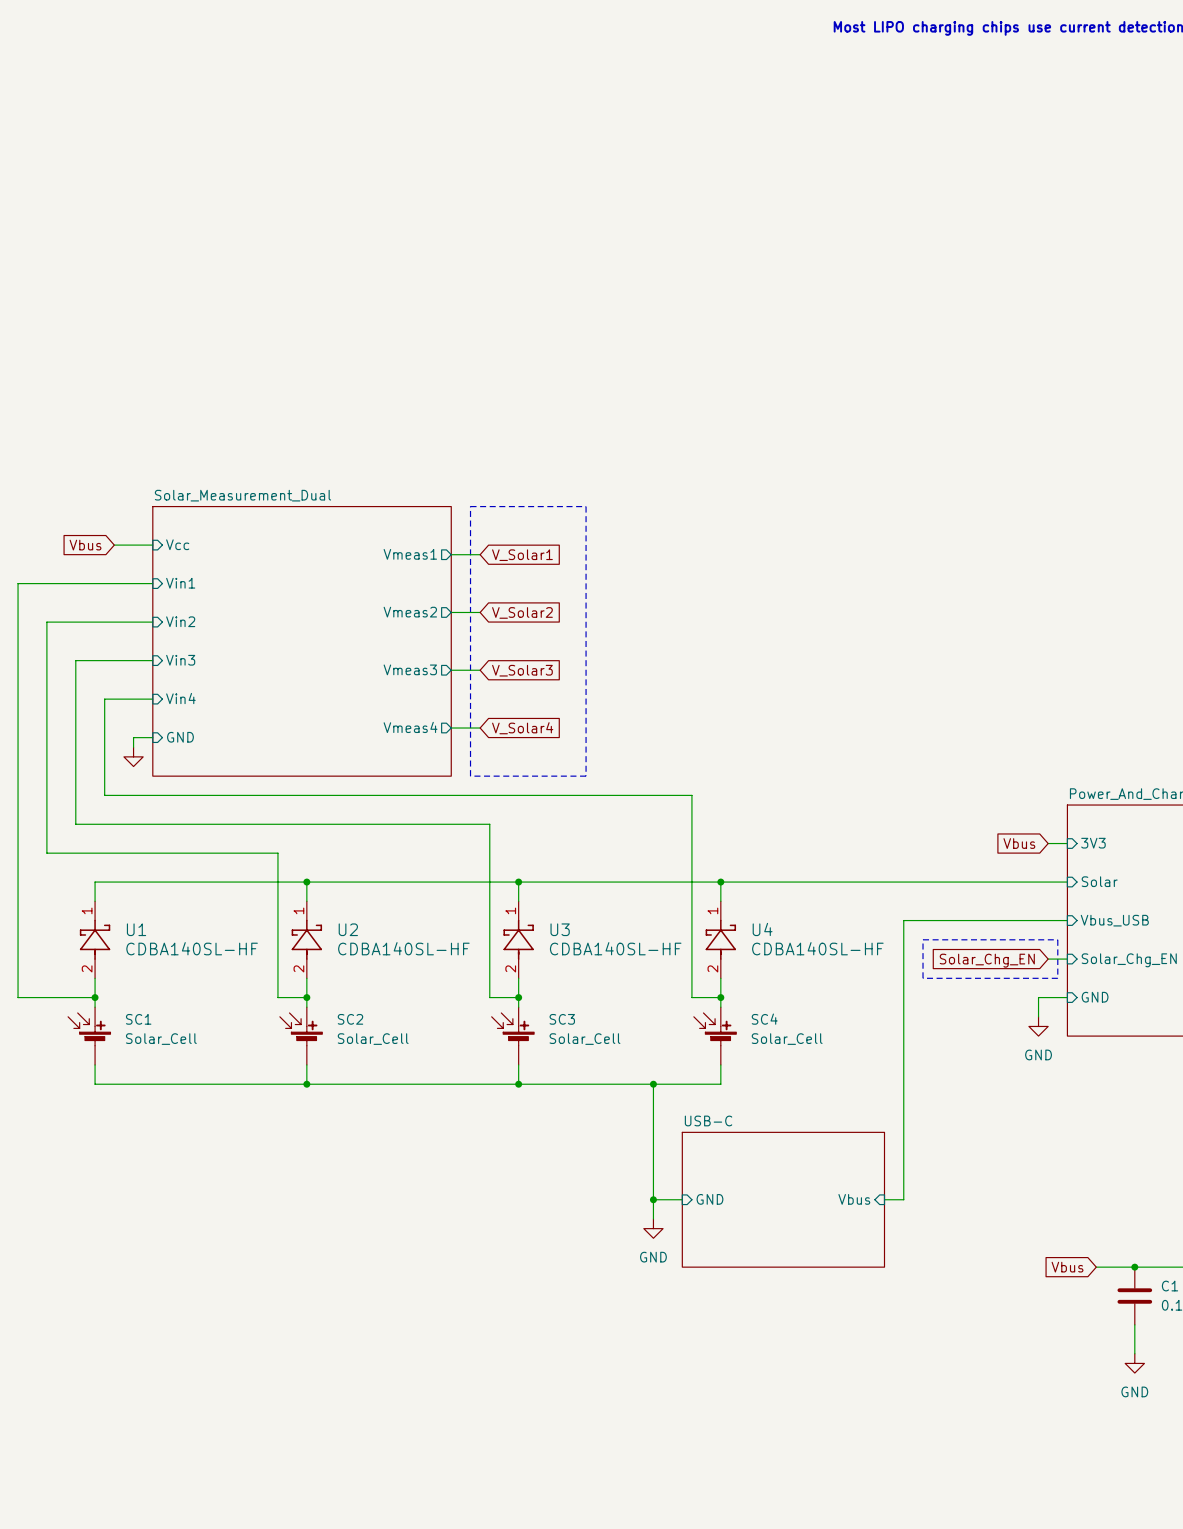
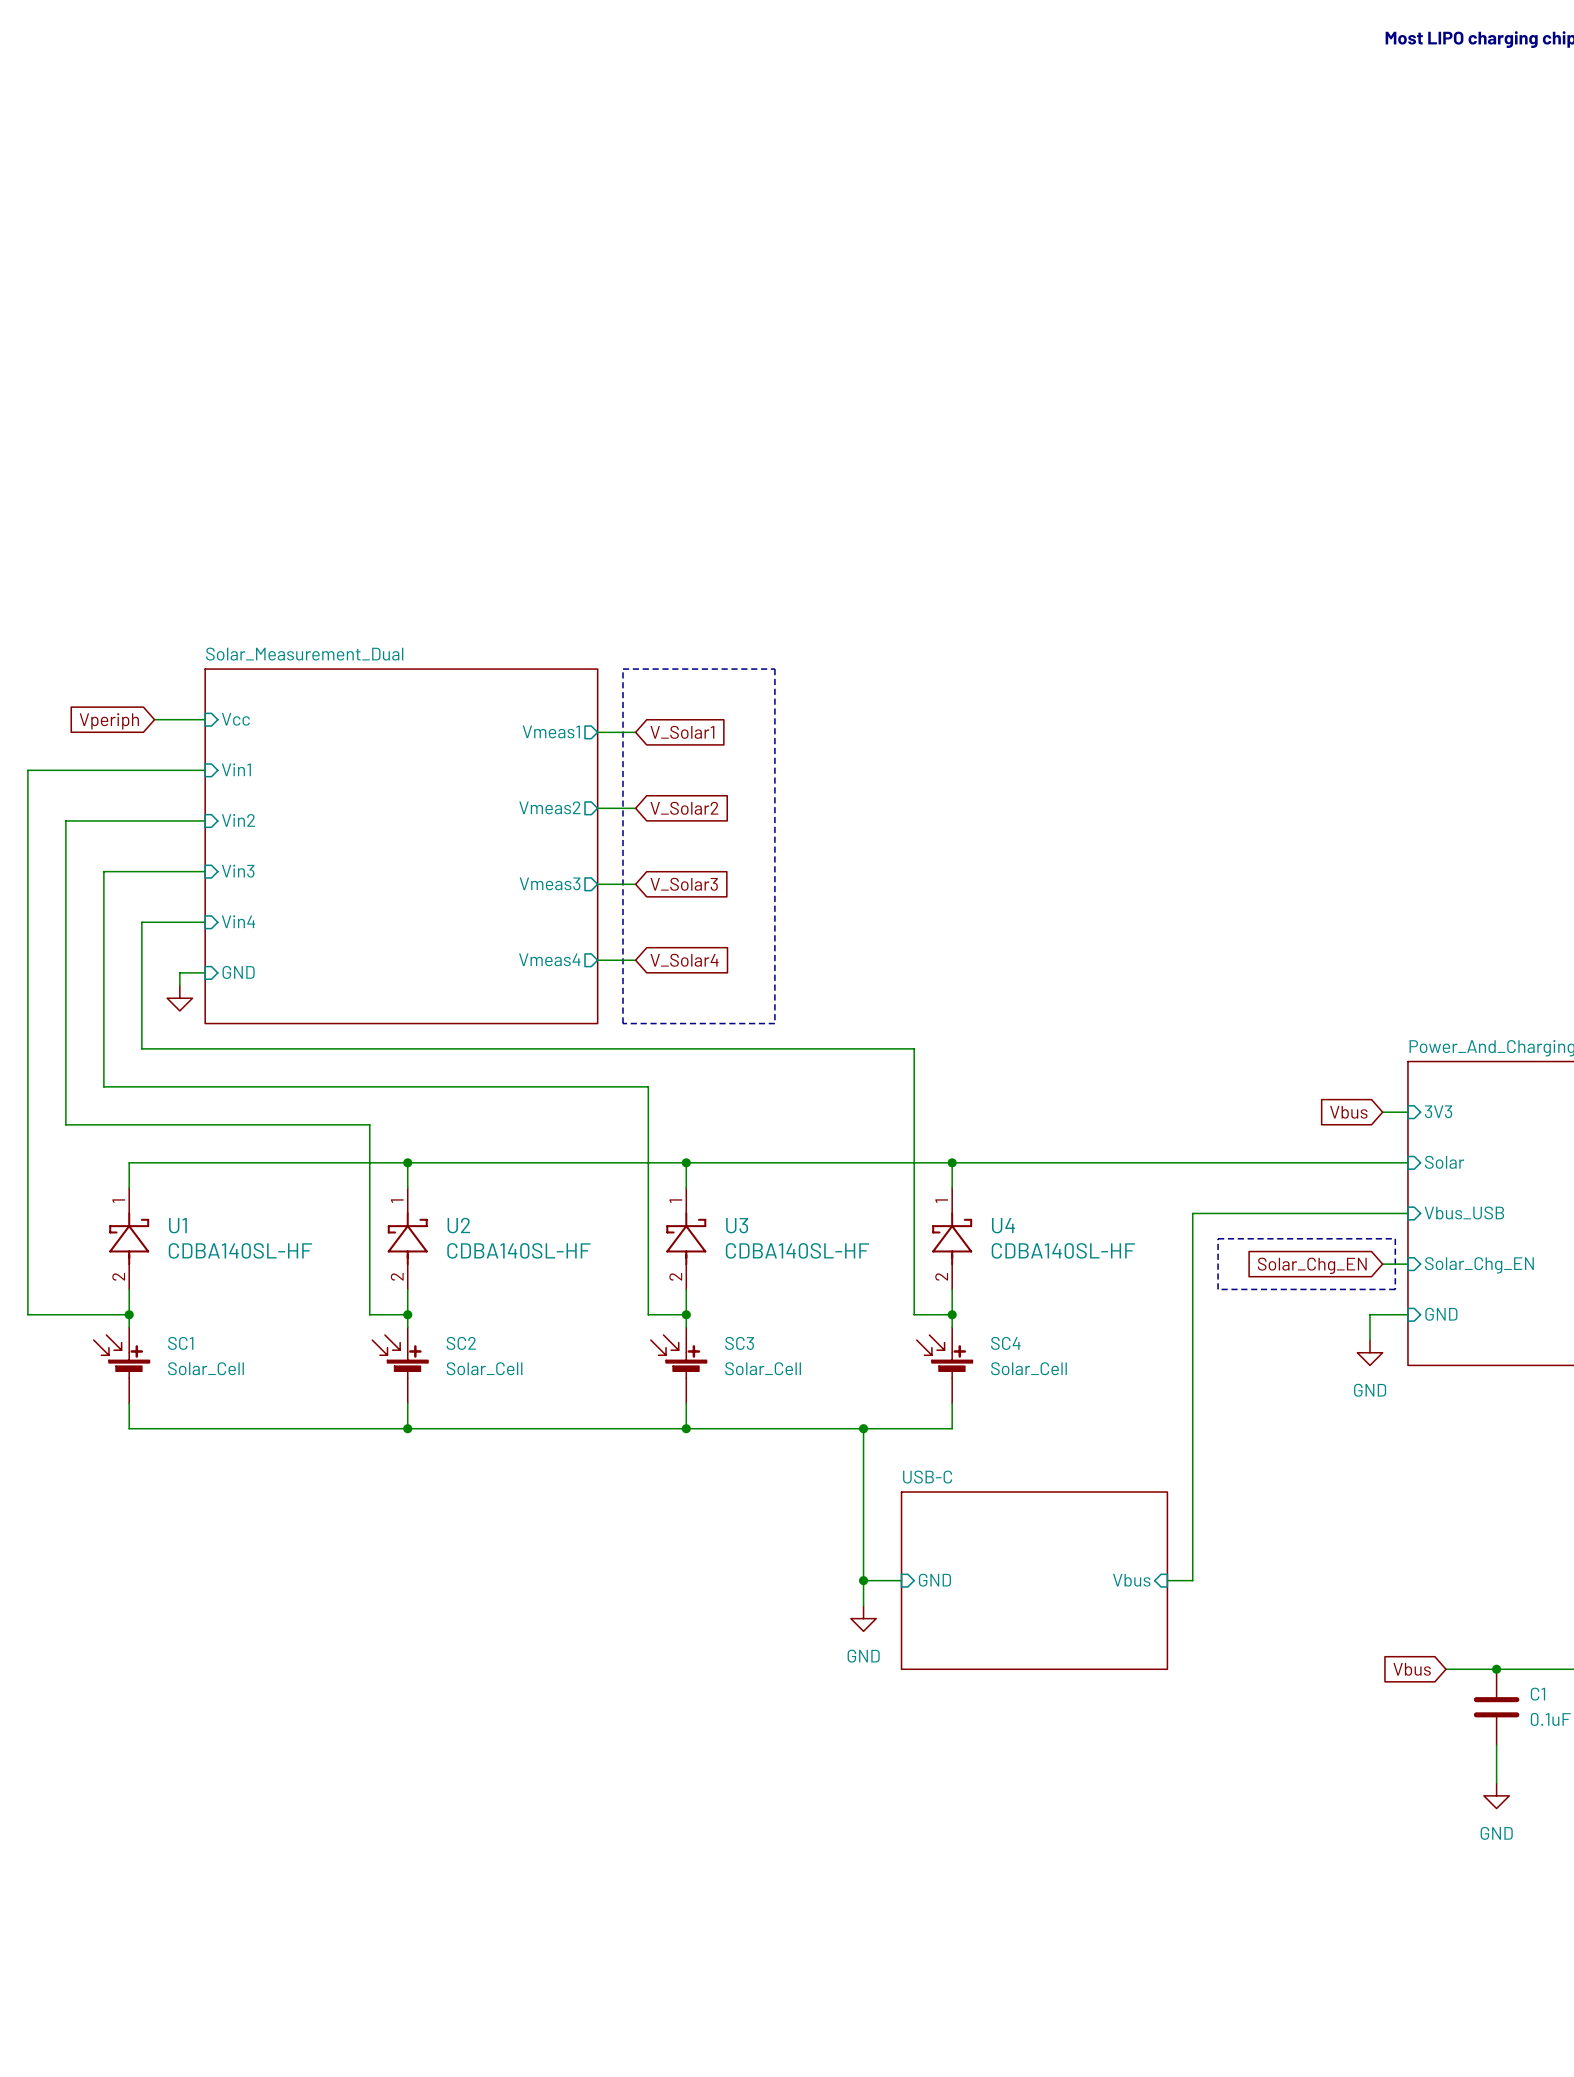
global label: Vbus (85, 545) -> Vperiph (109, 721)

